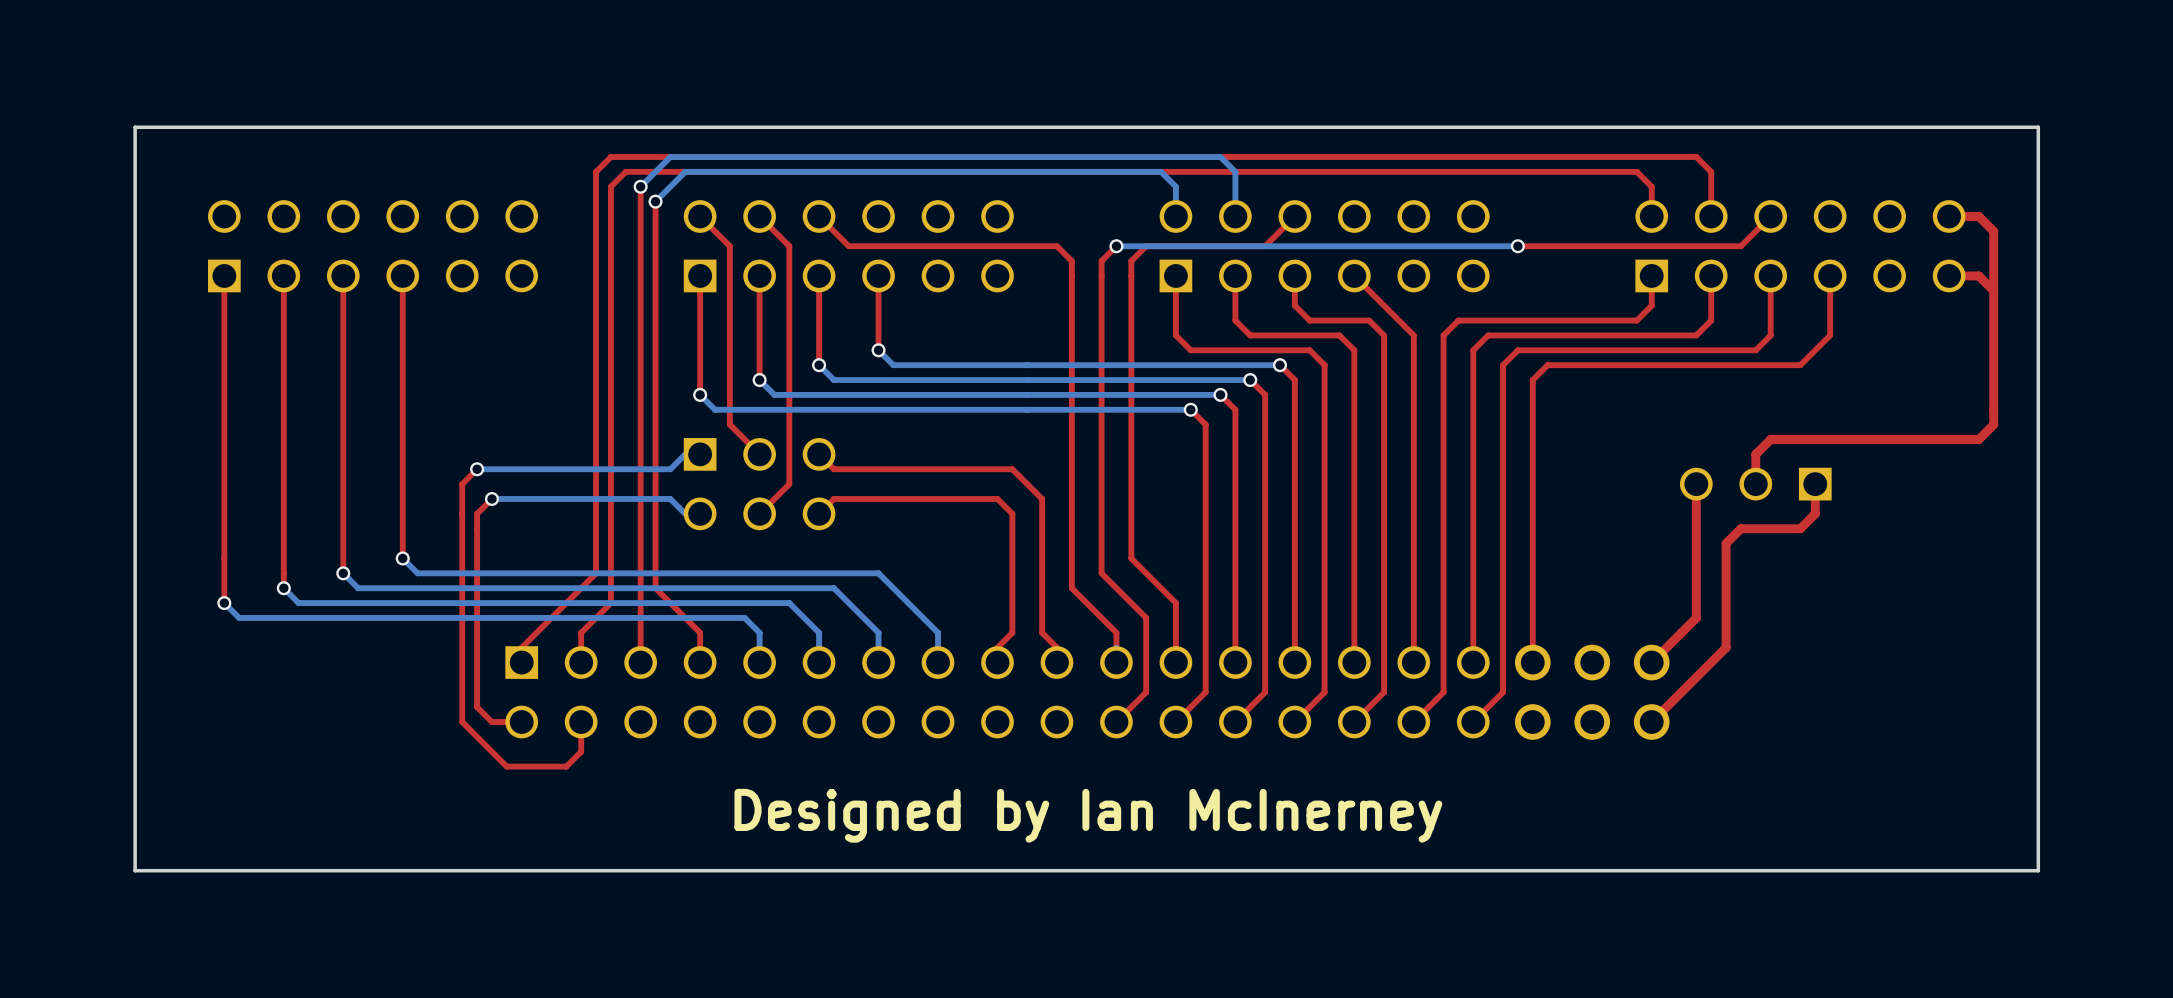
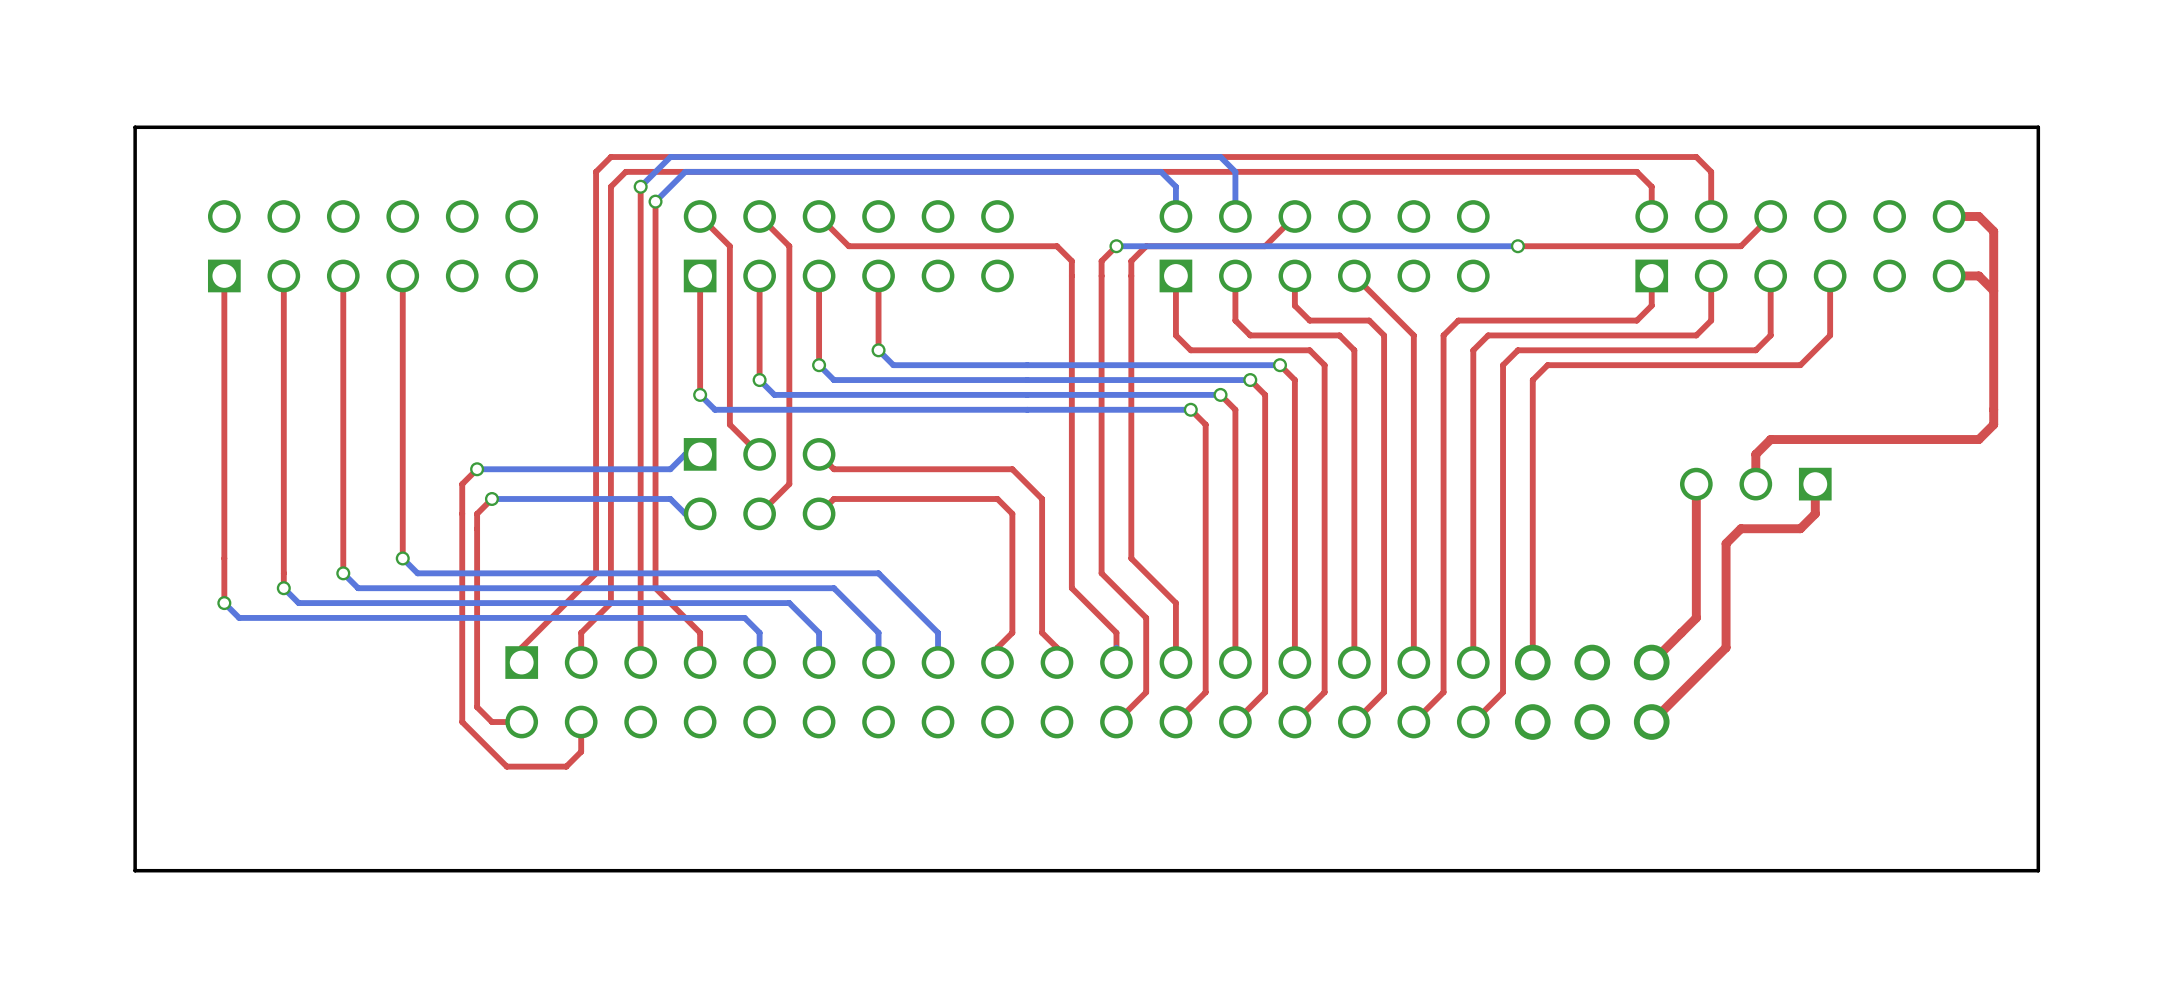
text: Designed by Ian McInerney (1088, 815) -> none

